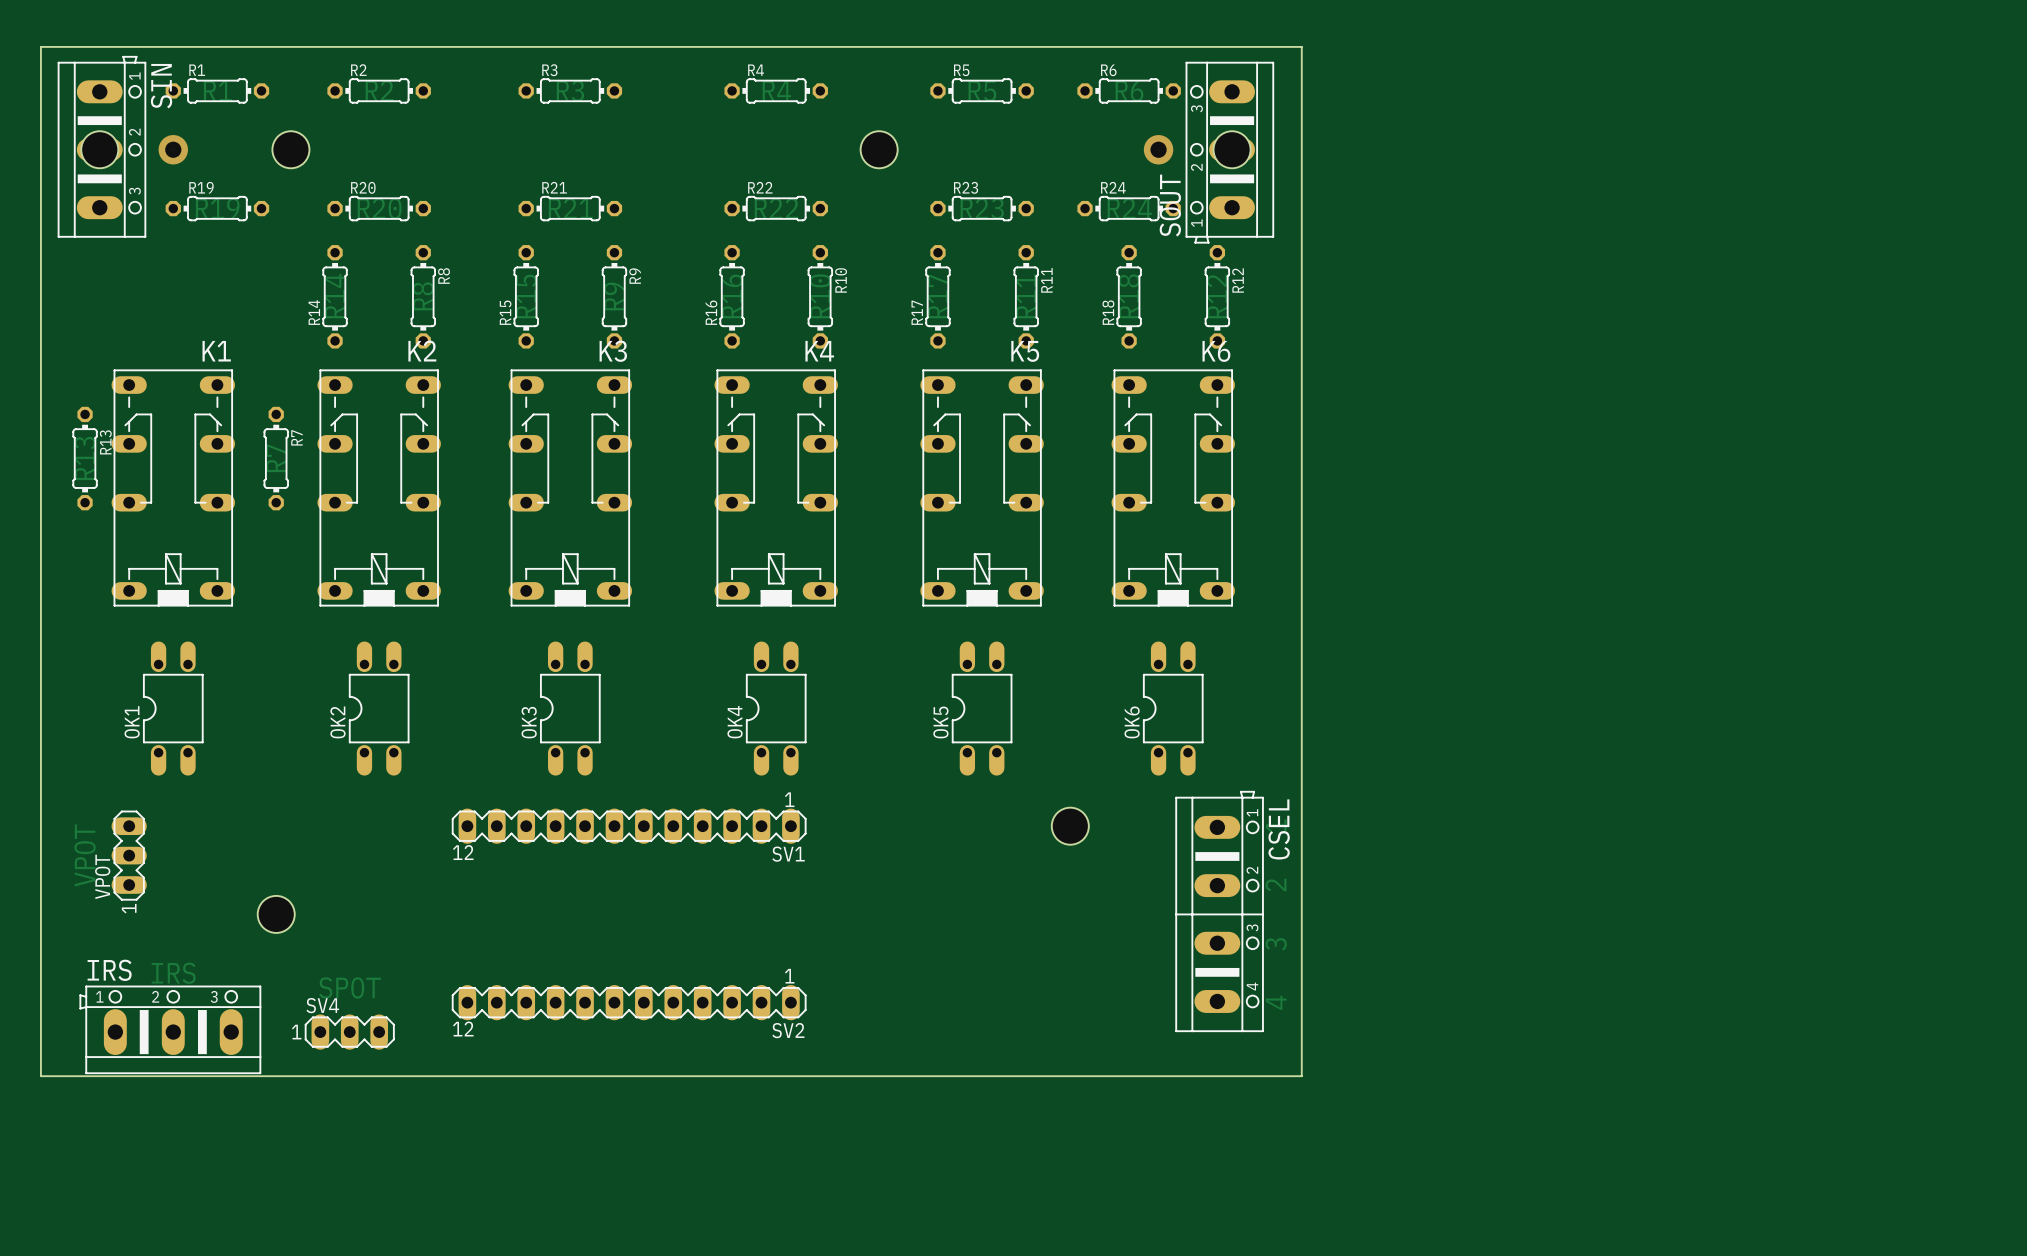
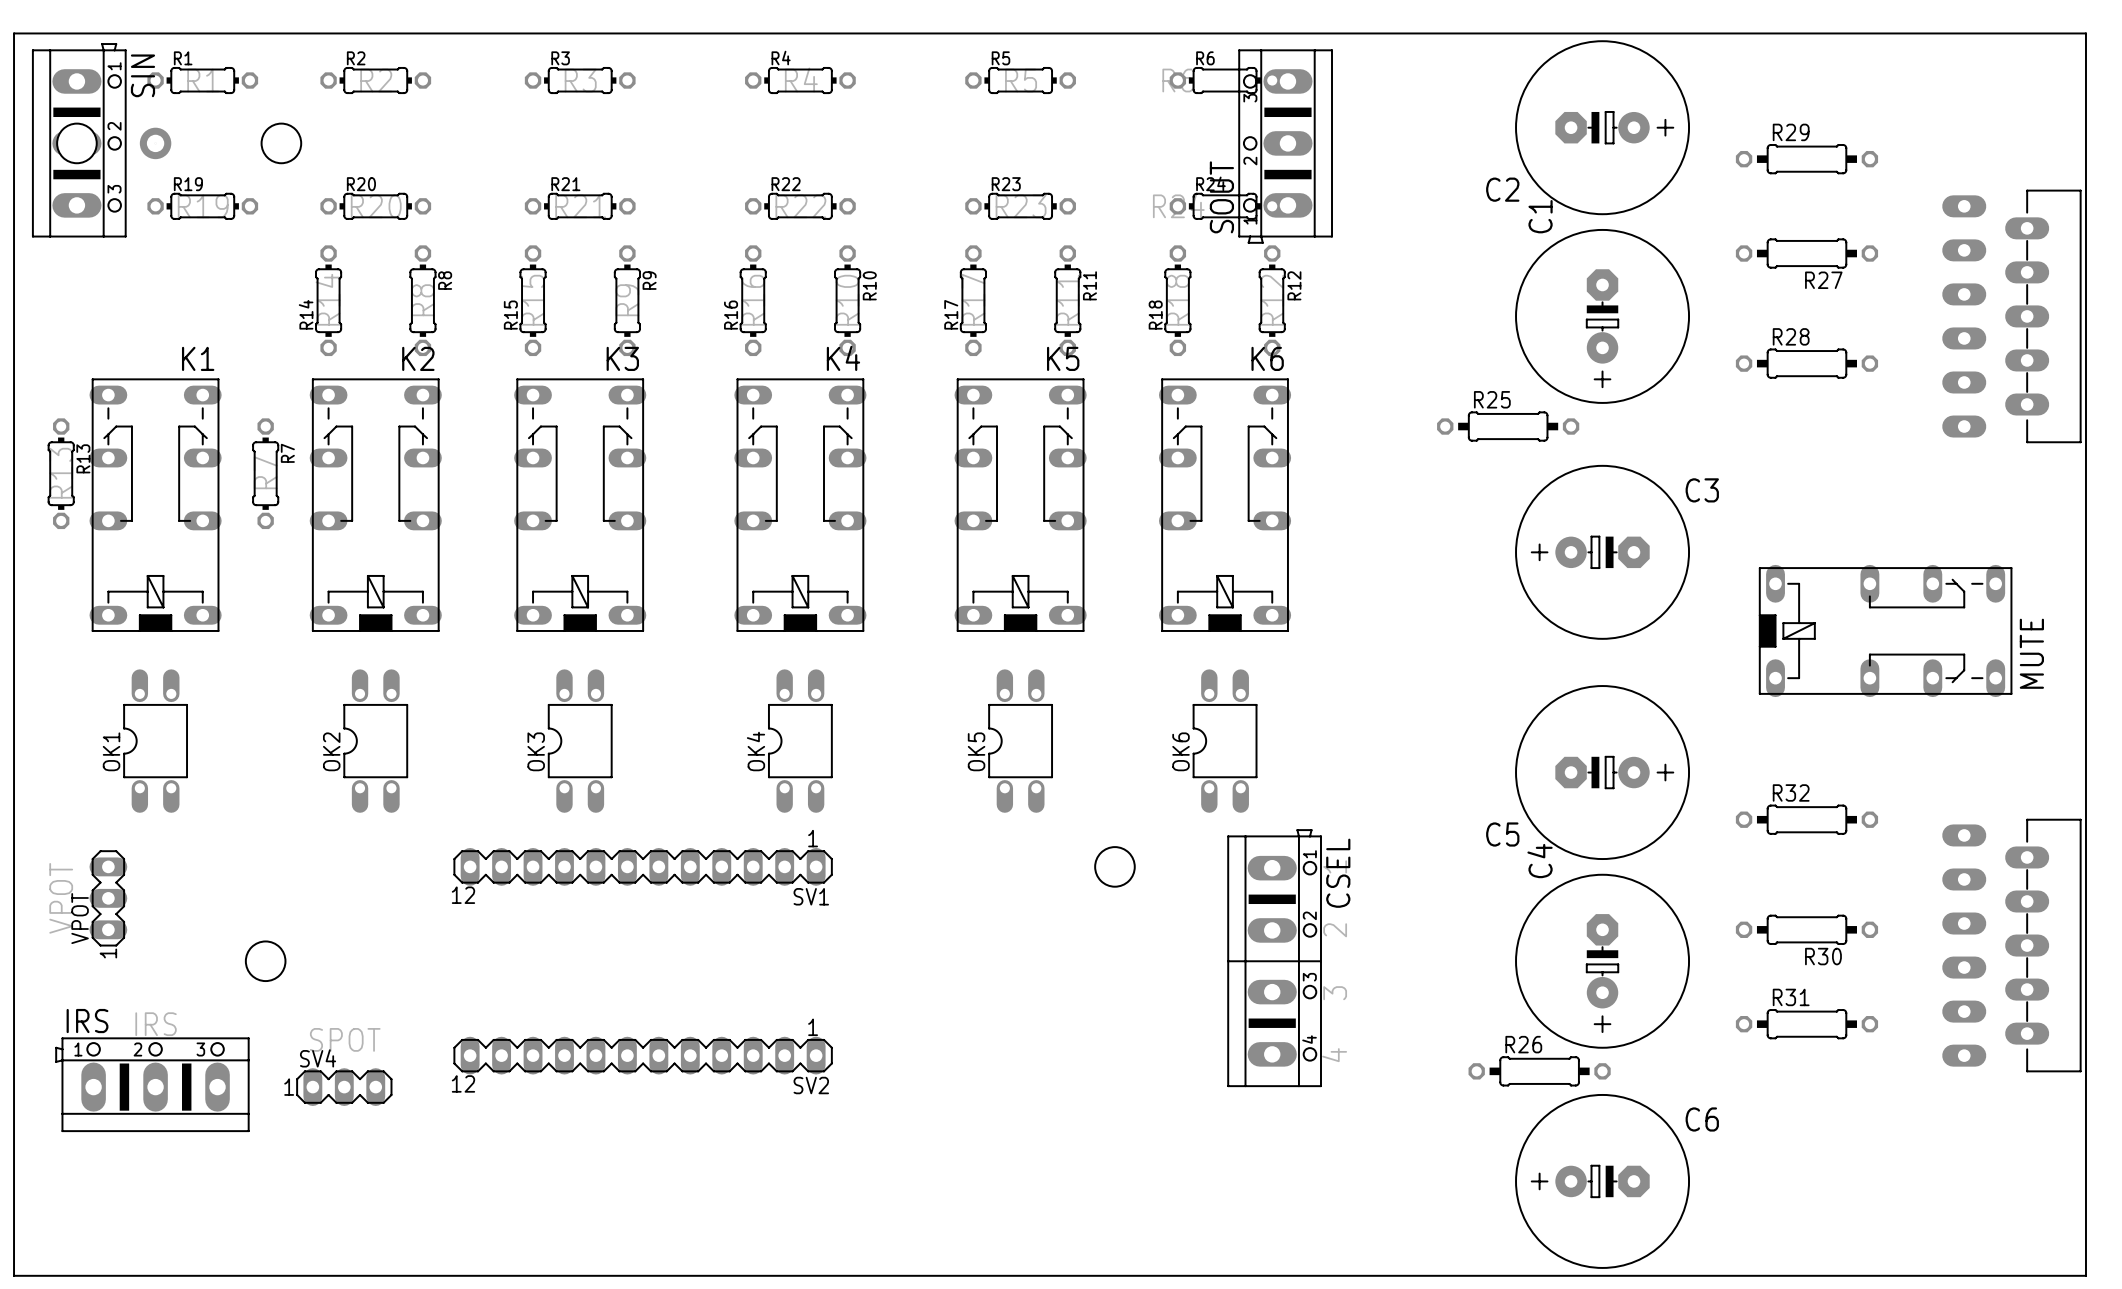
board edge: (1301, 46) (1301, 1076) (40, 1076) -> (1362, 33) (2085, 33) (2085, 1275) (14, 1275) (14, 1134)
R6 position: (1129, 90) -> (1225, 80)
C2: none -> (1602, 127)
hole: (879, 149) -> none
via: (1158, 149) -> none
hole: (1232, 149) -> none
R29: none -> (1806, 159)
R24 position: (1129, 208) -> (1225, 206)
R27: none -> (1806, 253)
C1: none -> (1602, 316)
part: none -> (2011, 316)
R28: none -> (1806, 363)
R25: none -> (1508, 426)
C3: none -> (1602, 552)
MUTE: none -> (1885, 630)
C5: none -> (1602, 772)
R32: none -> (1806, 819)
R30: none -> (1806, 929)
part: none -> (2011, 945)
C4: none -> (1602, 961)
R31: none -> (1806, 1024)
R26: none -> (1539, 1071)
C6: none -> (1602, 1181)

